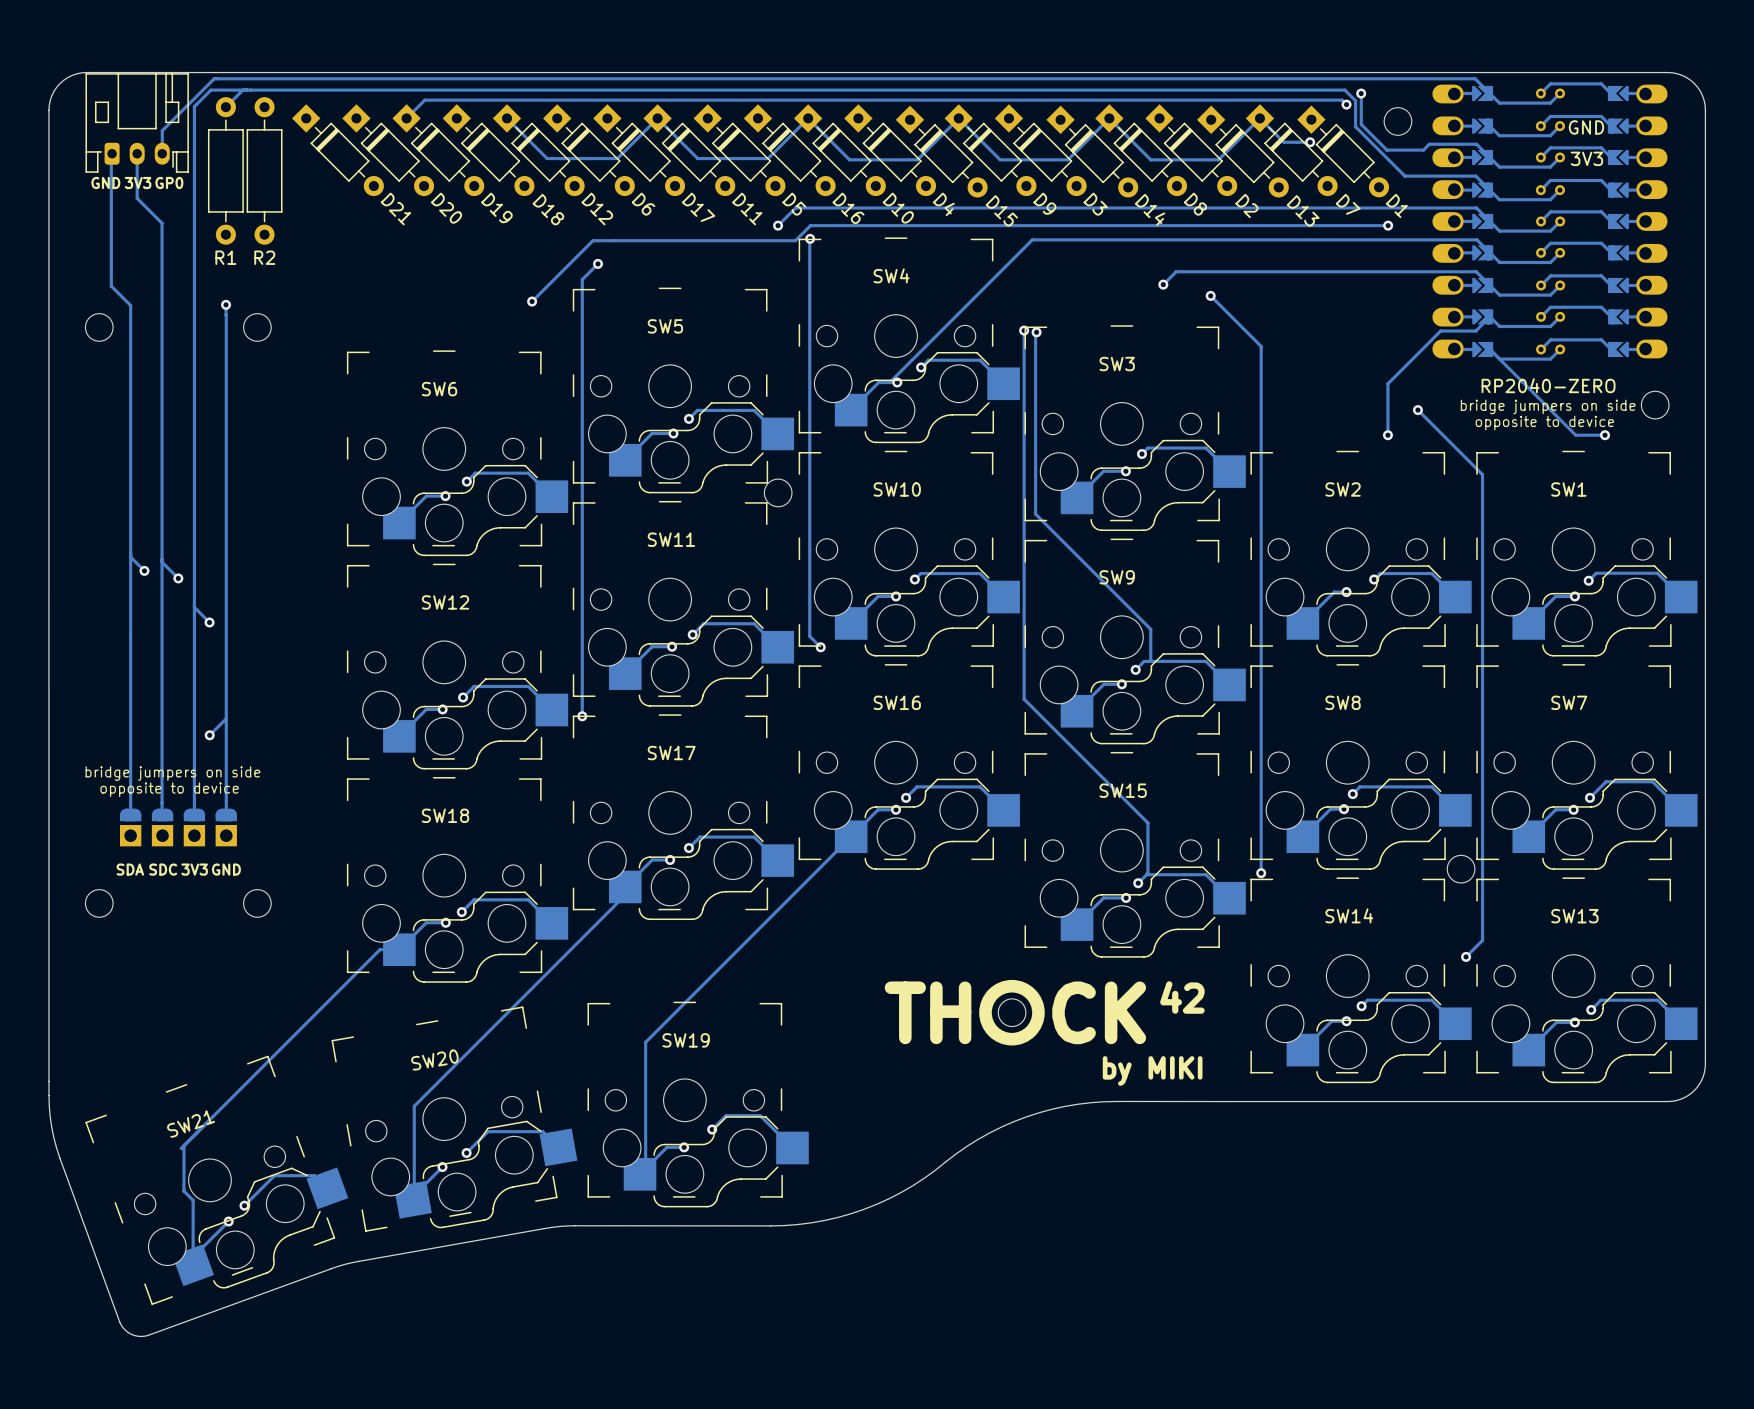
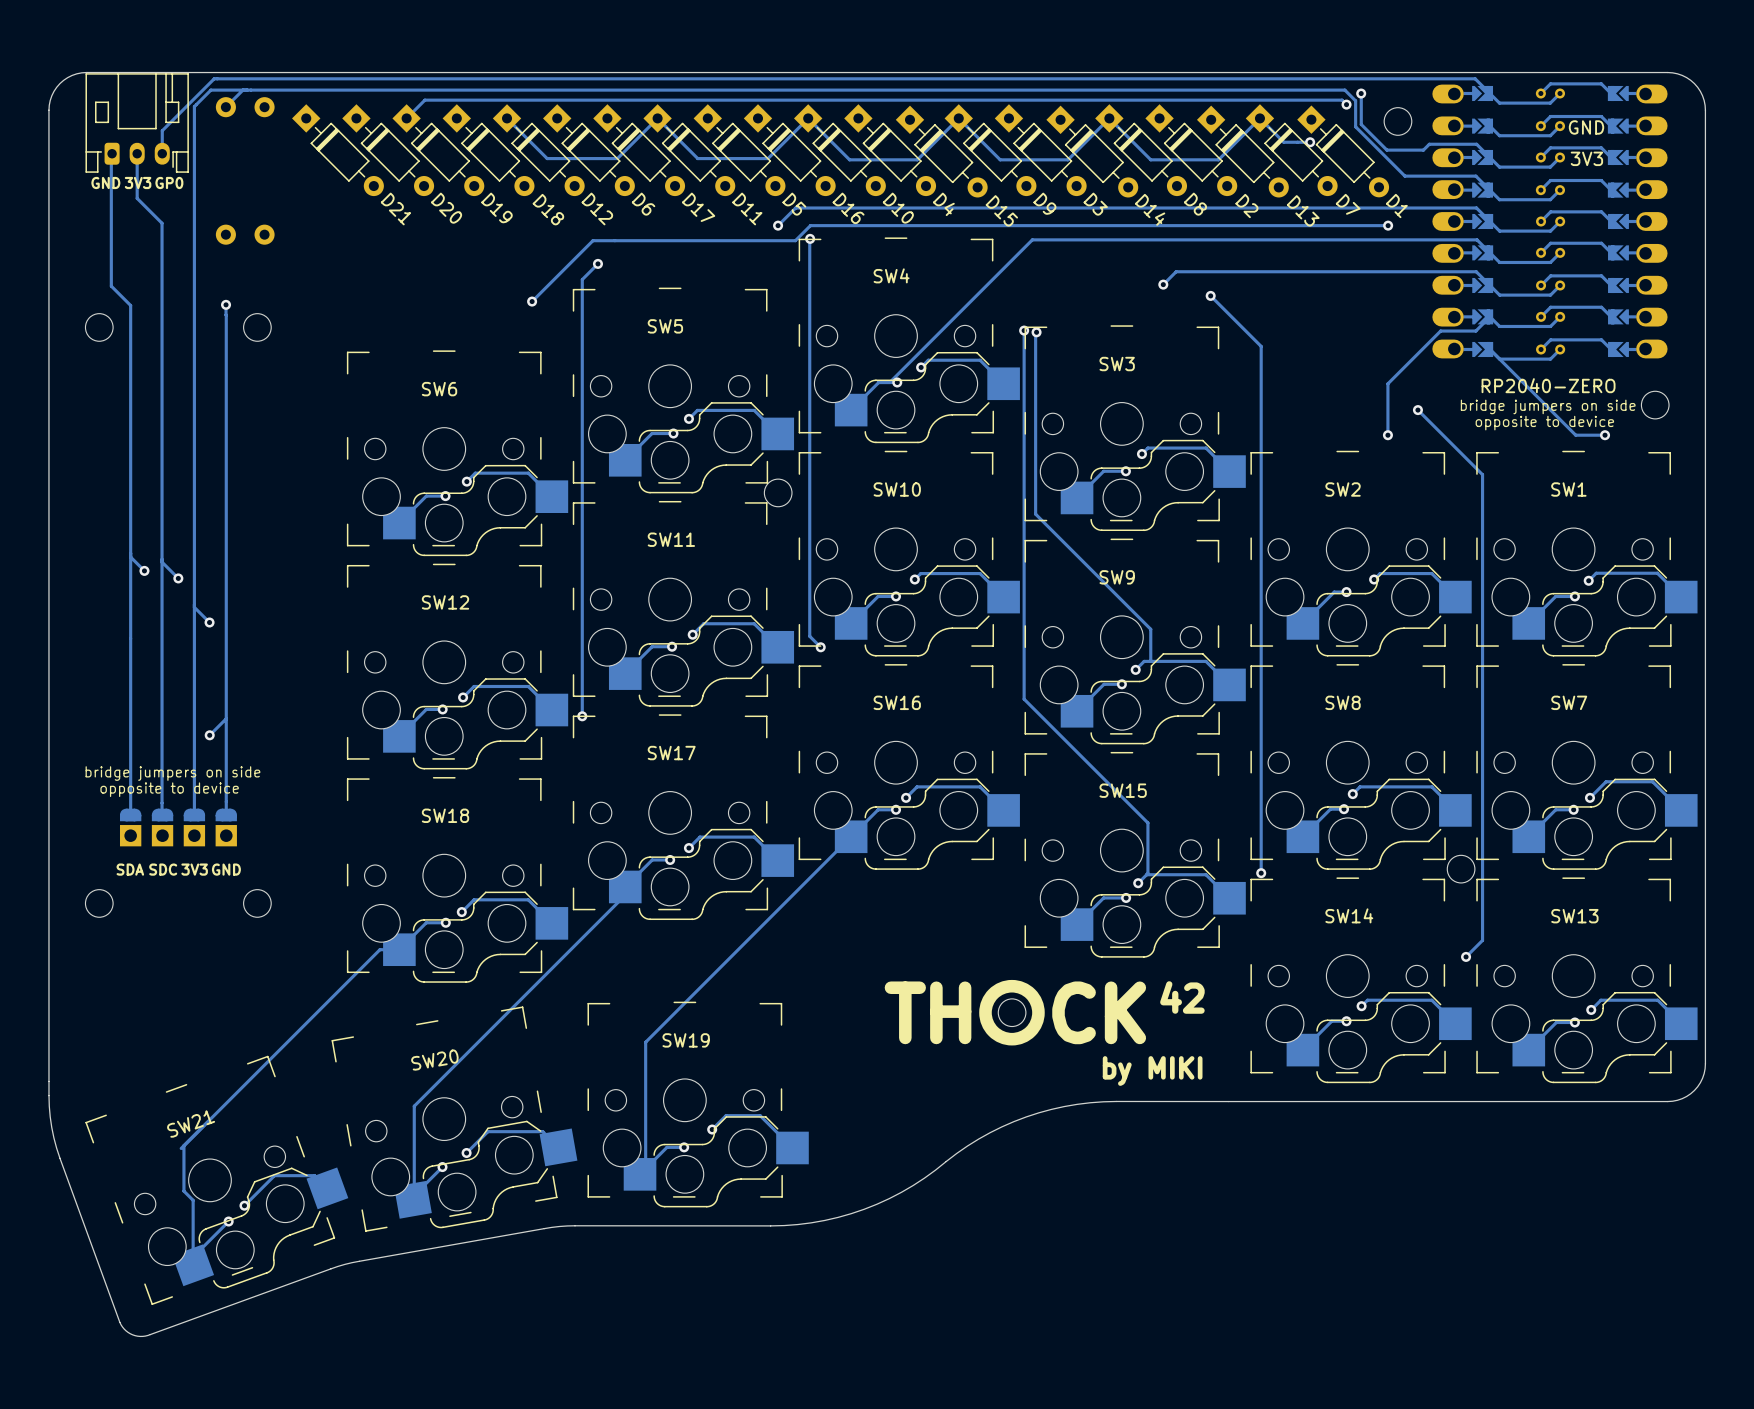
drawing: [207, 119, 283, 223] -> none
text: R1 (225, 257) -> none
text: R2 (264, 257) -> none

